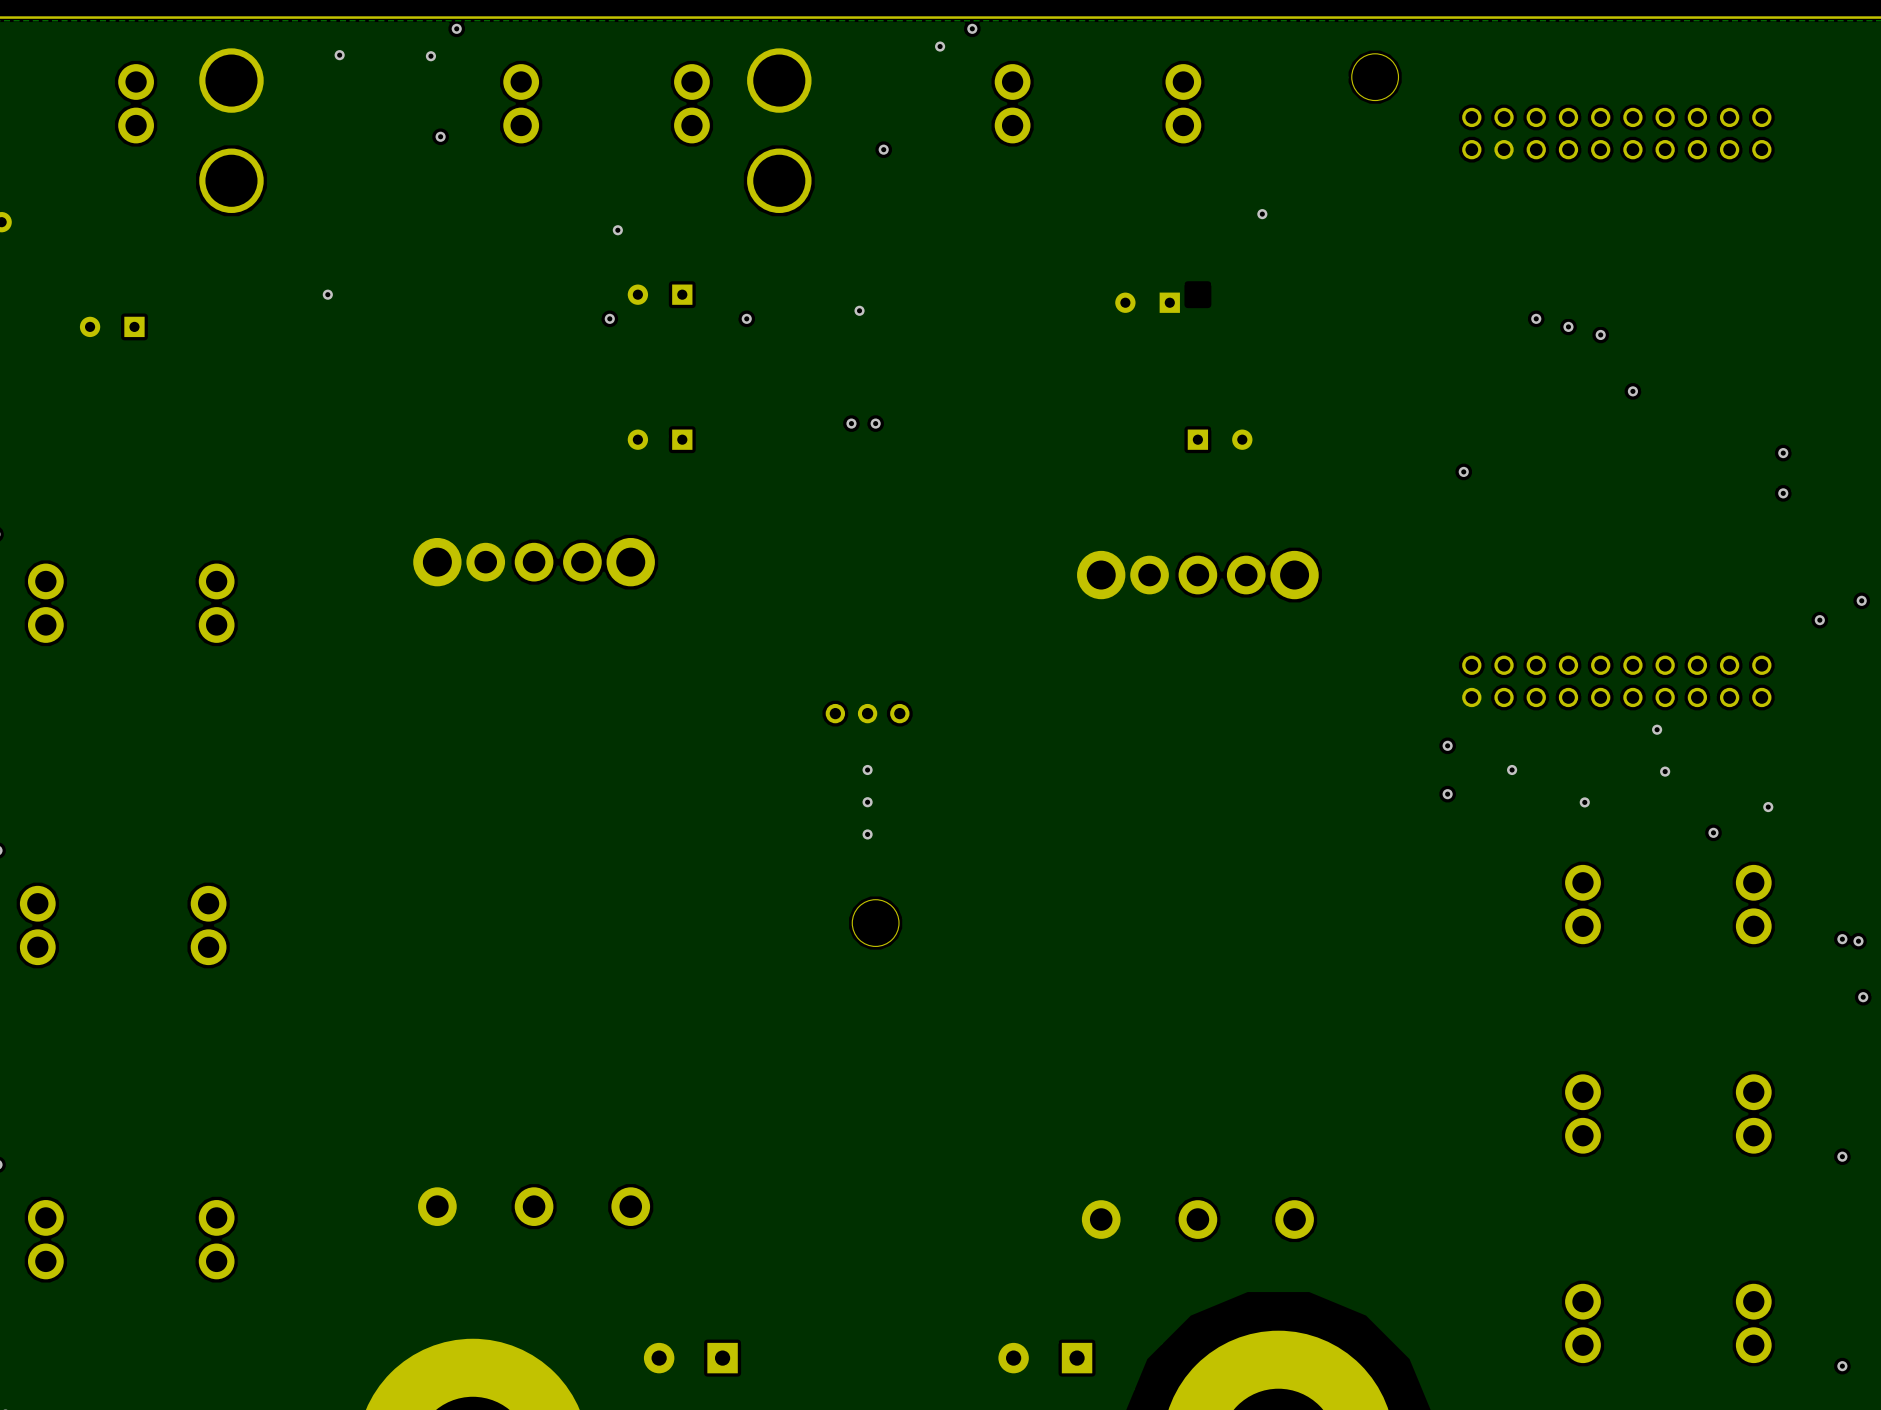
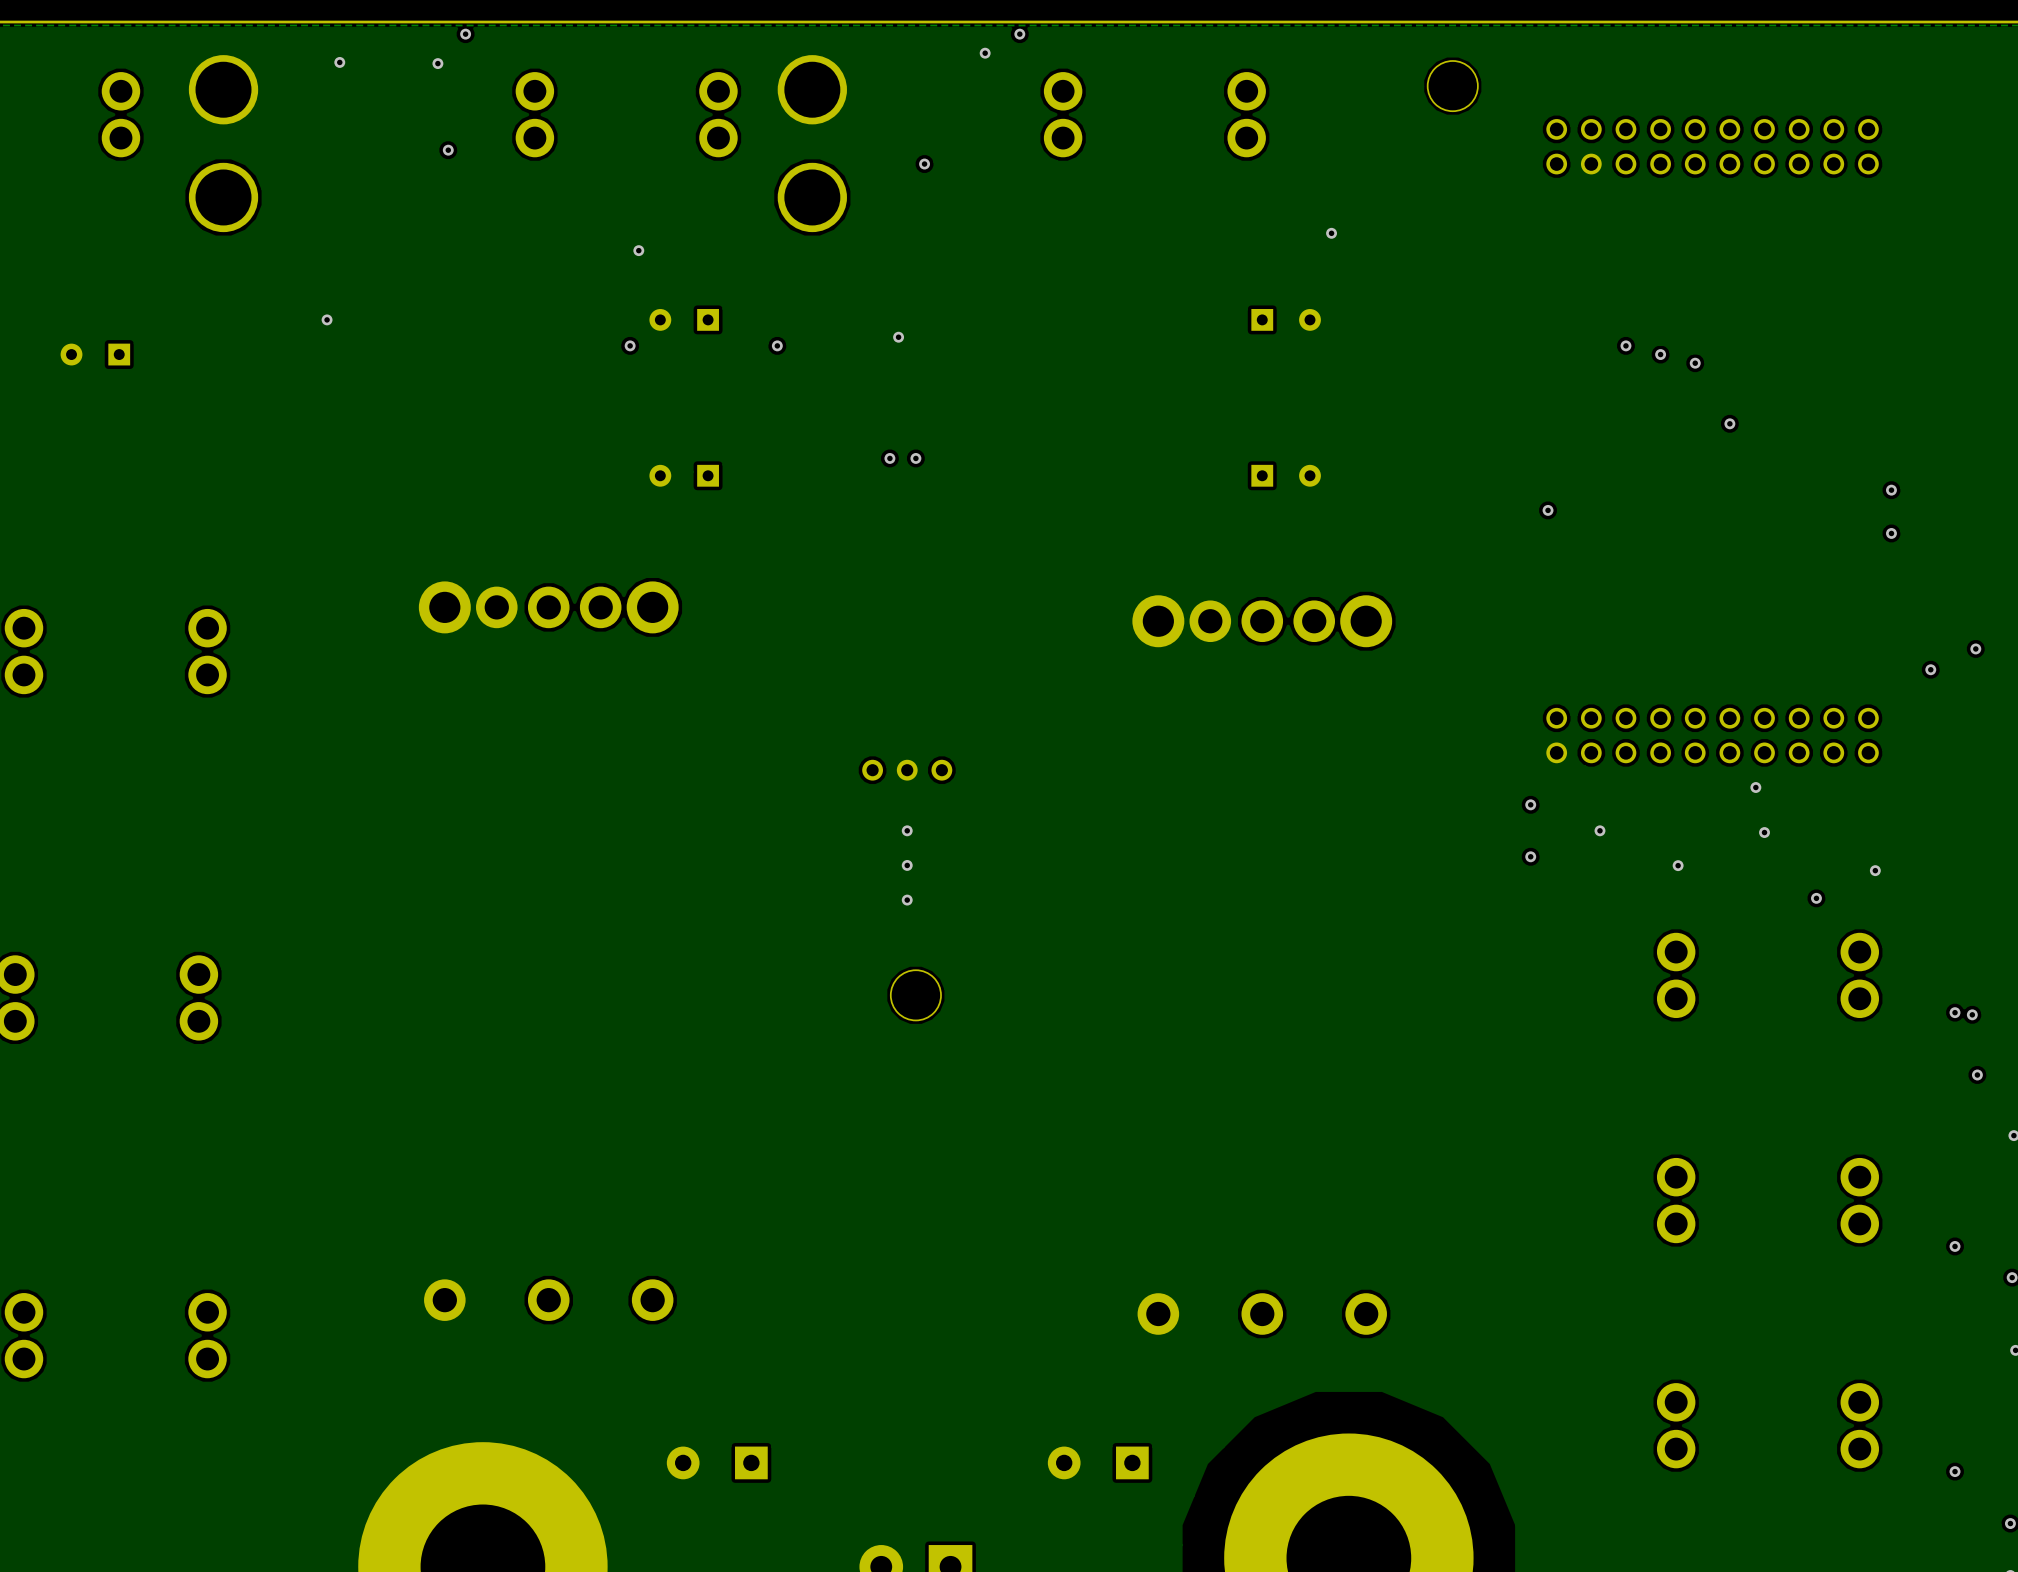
part rotation: 0° (1147, 302) -> 180° (1286, 319)
part position: (1147, 302) -> (1286, 319)

